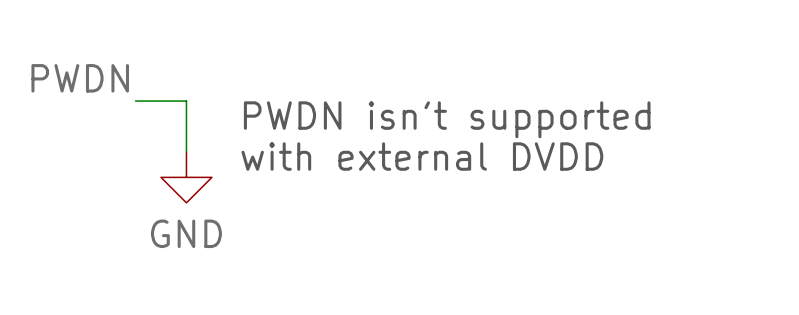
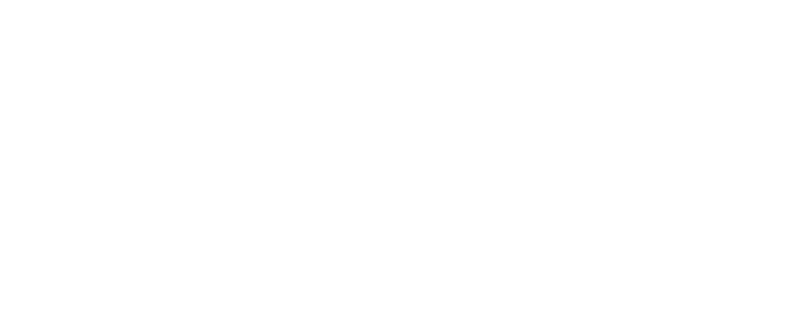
label: PWDN (80, 78) -> none
wire: (135, 101) (186, 101) (186, 151) -> none
text: PWDN isn't supported (447, 119) -> none
text: with external DVDD (422, 156) -> none
power symbol: GND (186, 177) -> none

